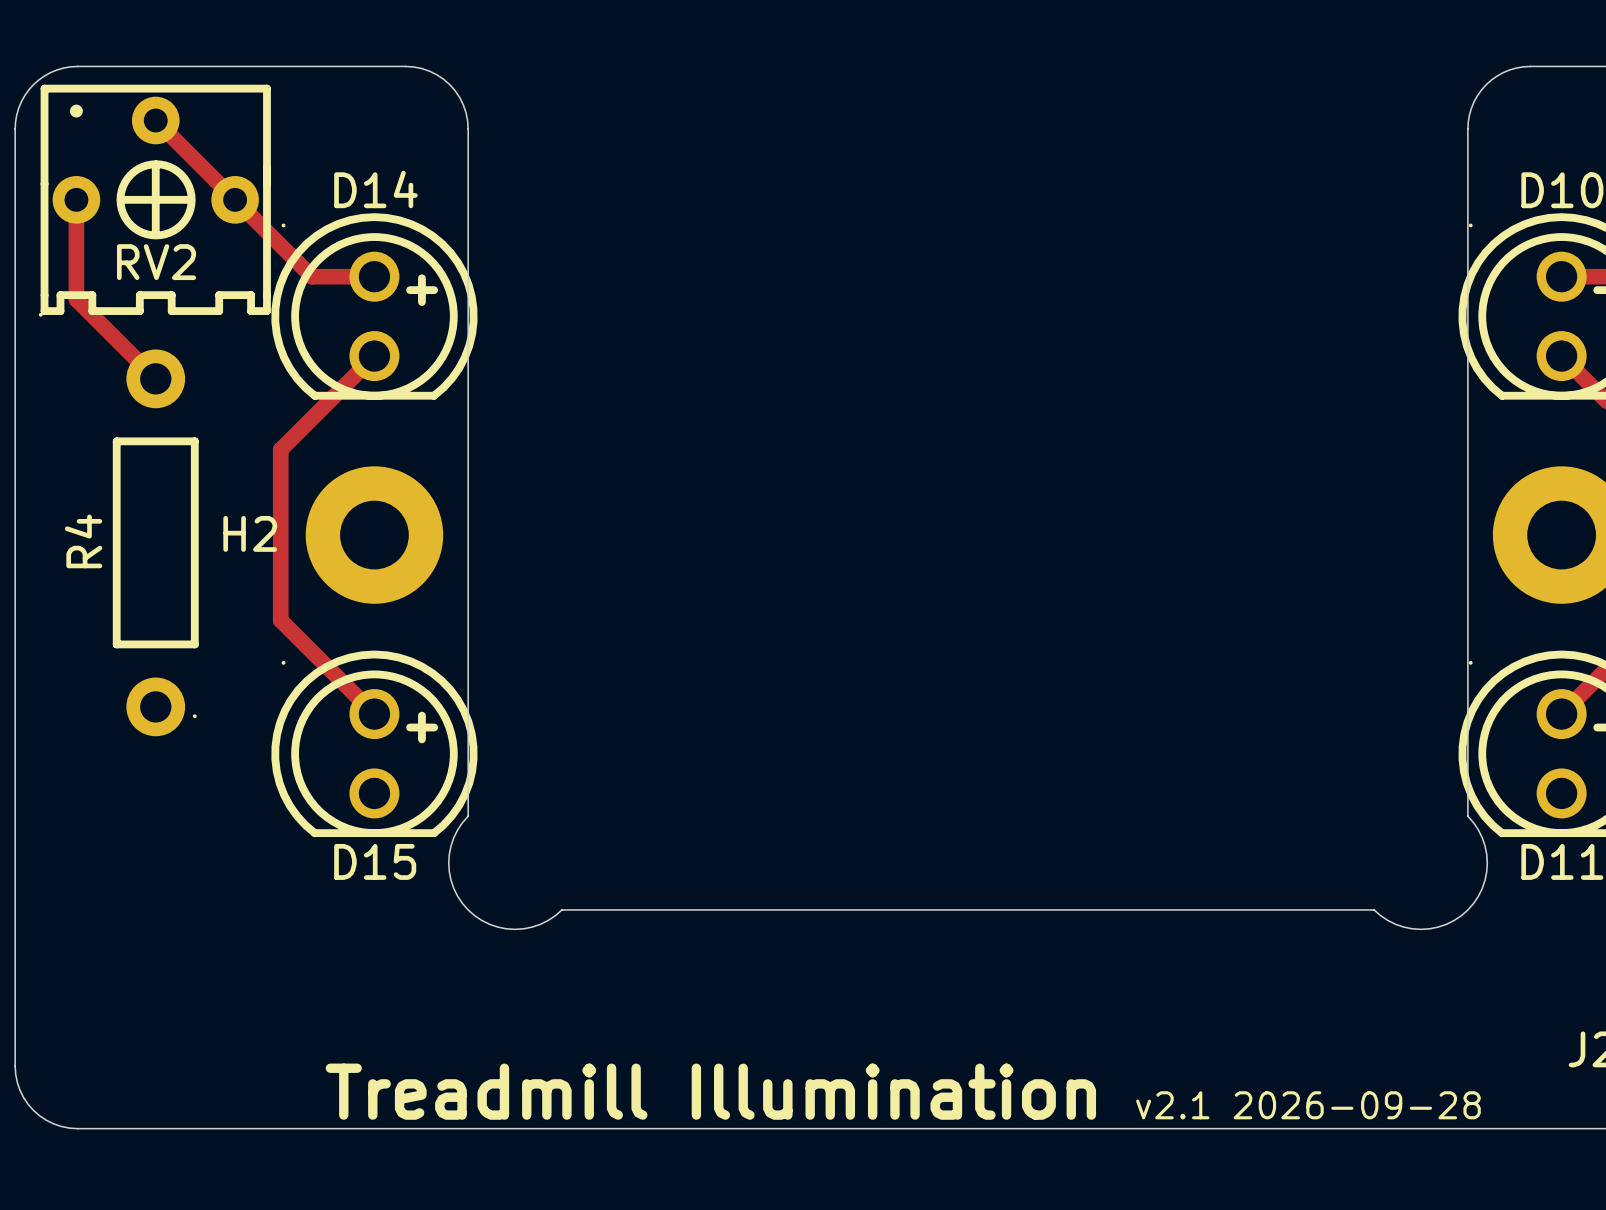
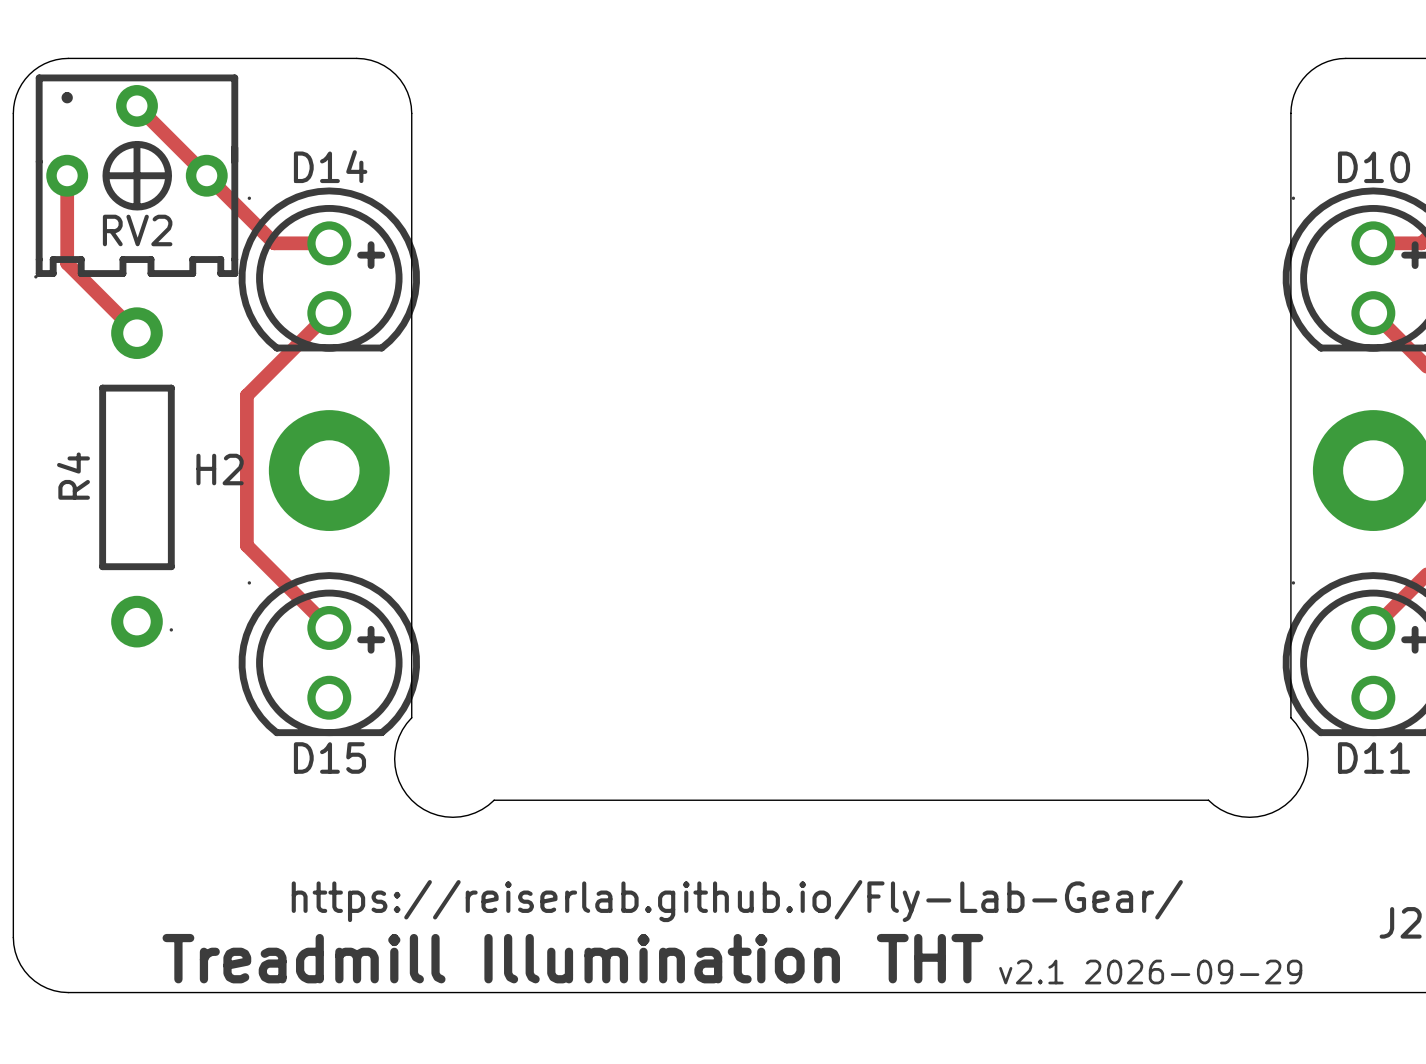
text: none -> https://reiserlab.github.io/Fly-Lab-Gear/ (737, 901)
text: Treadmill Illumination (710, 1091) -> Treadmill Illumination THT (572, 958)
text: v2.1 2026-09-28 (1308, 1105) -> v2.1 2026-09-29 (1150, 972)

